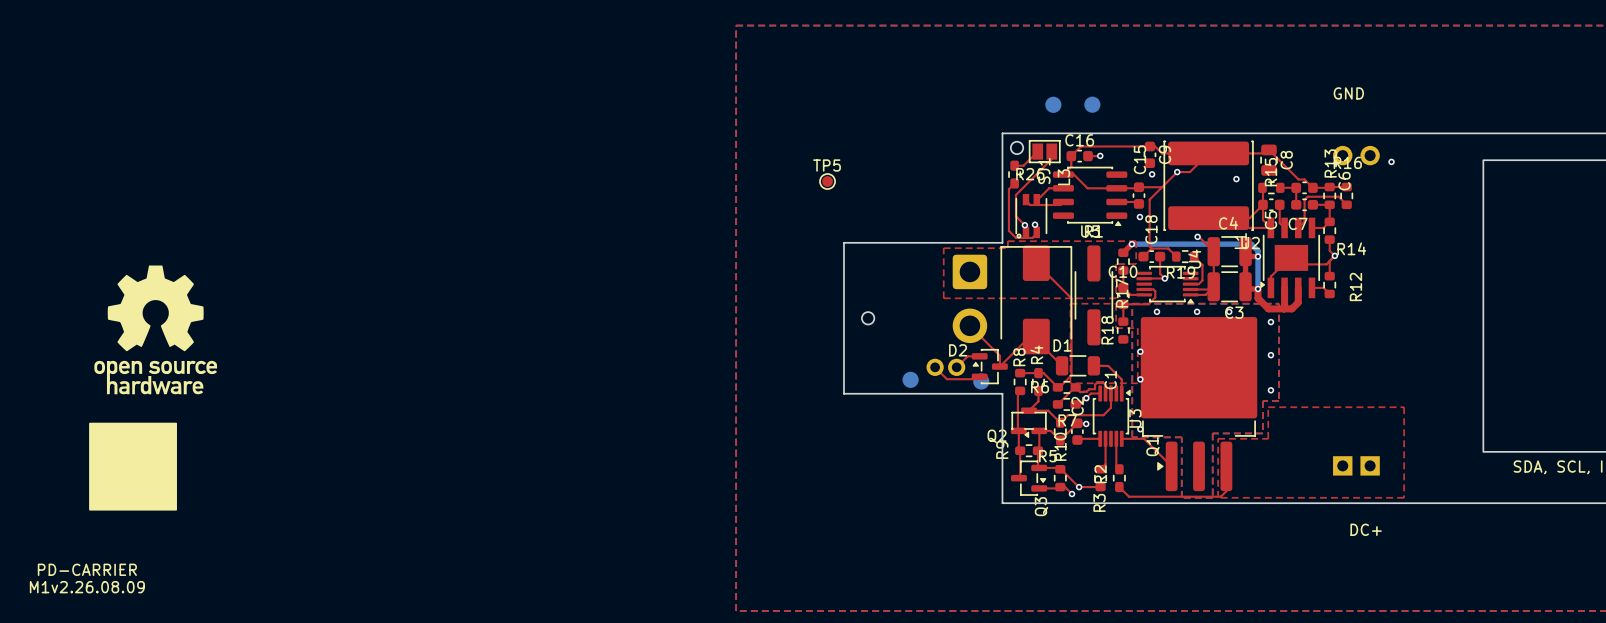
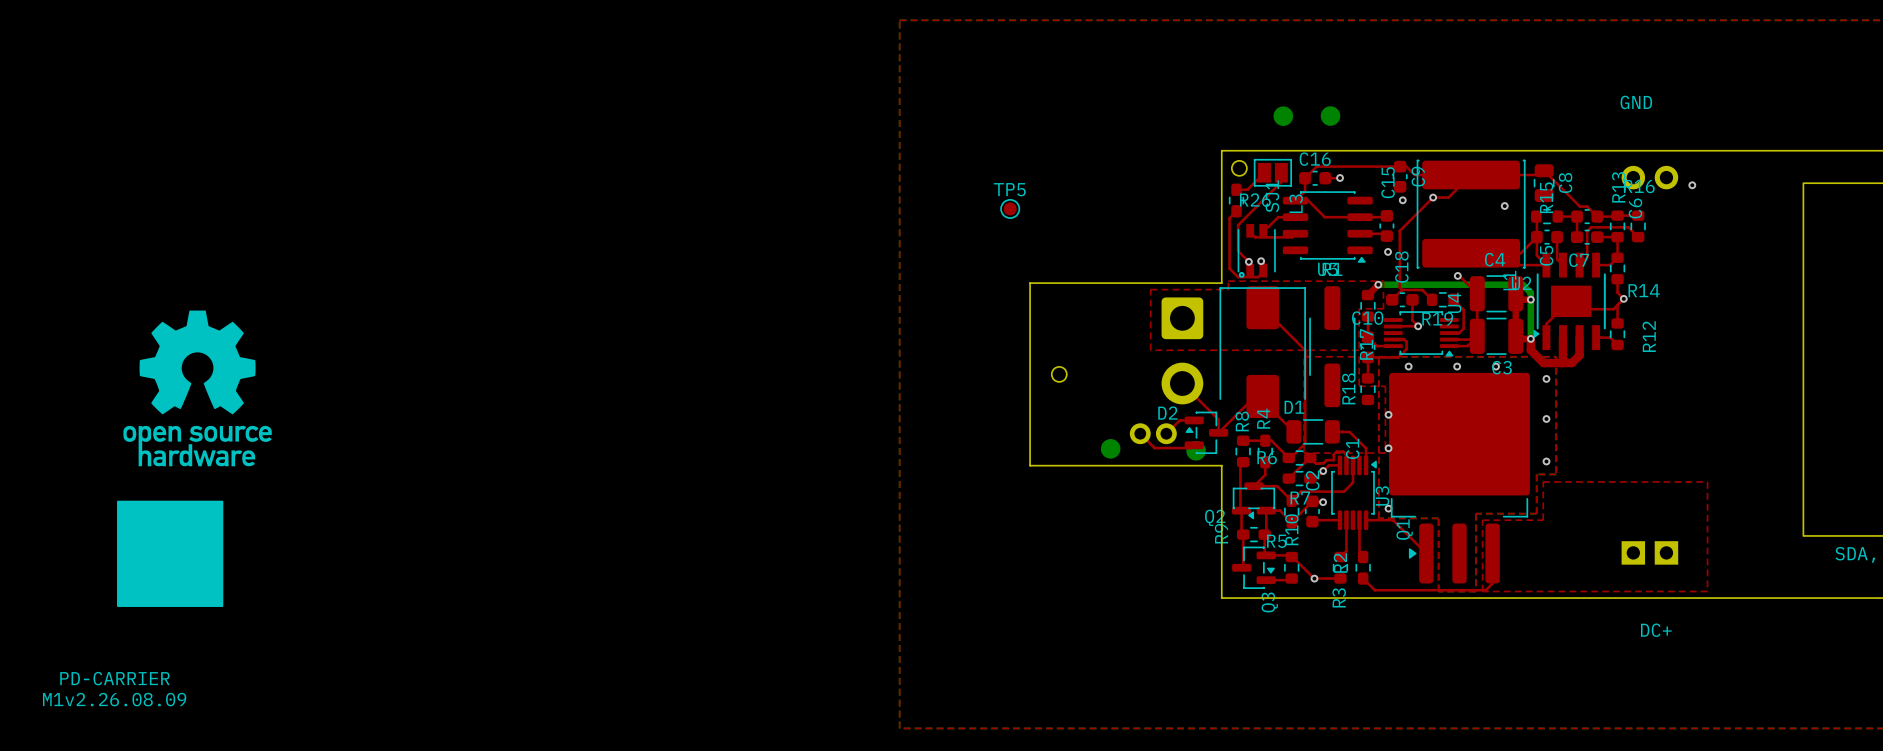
top track: (1138, 187) (1162, 187) -> none
top track: (1060, 487) (1065, 487) (1072, 494) -> none
via: (1072, 494) -> none

